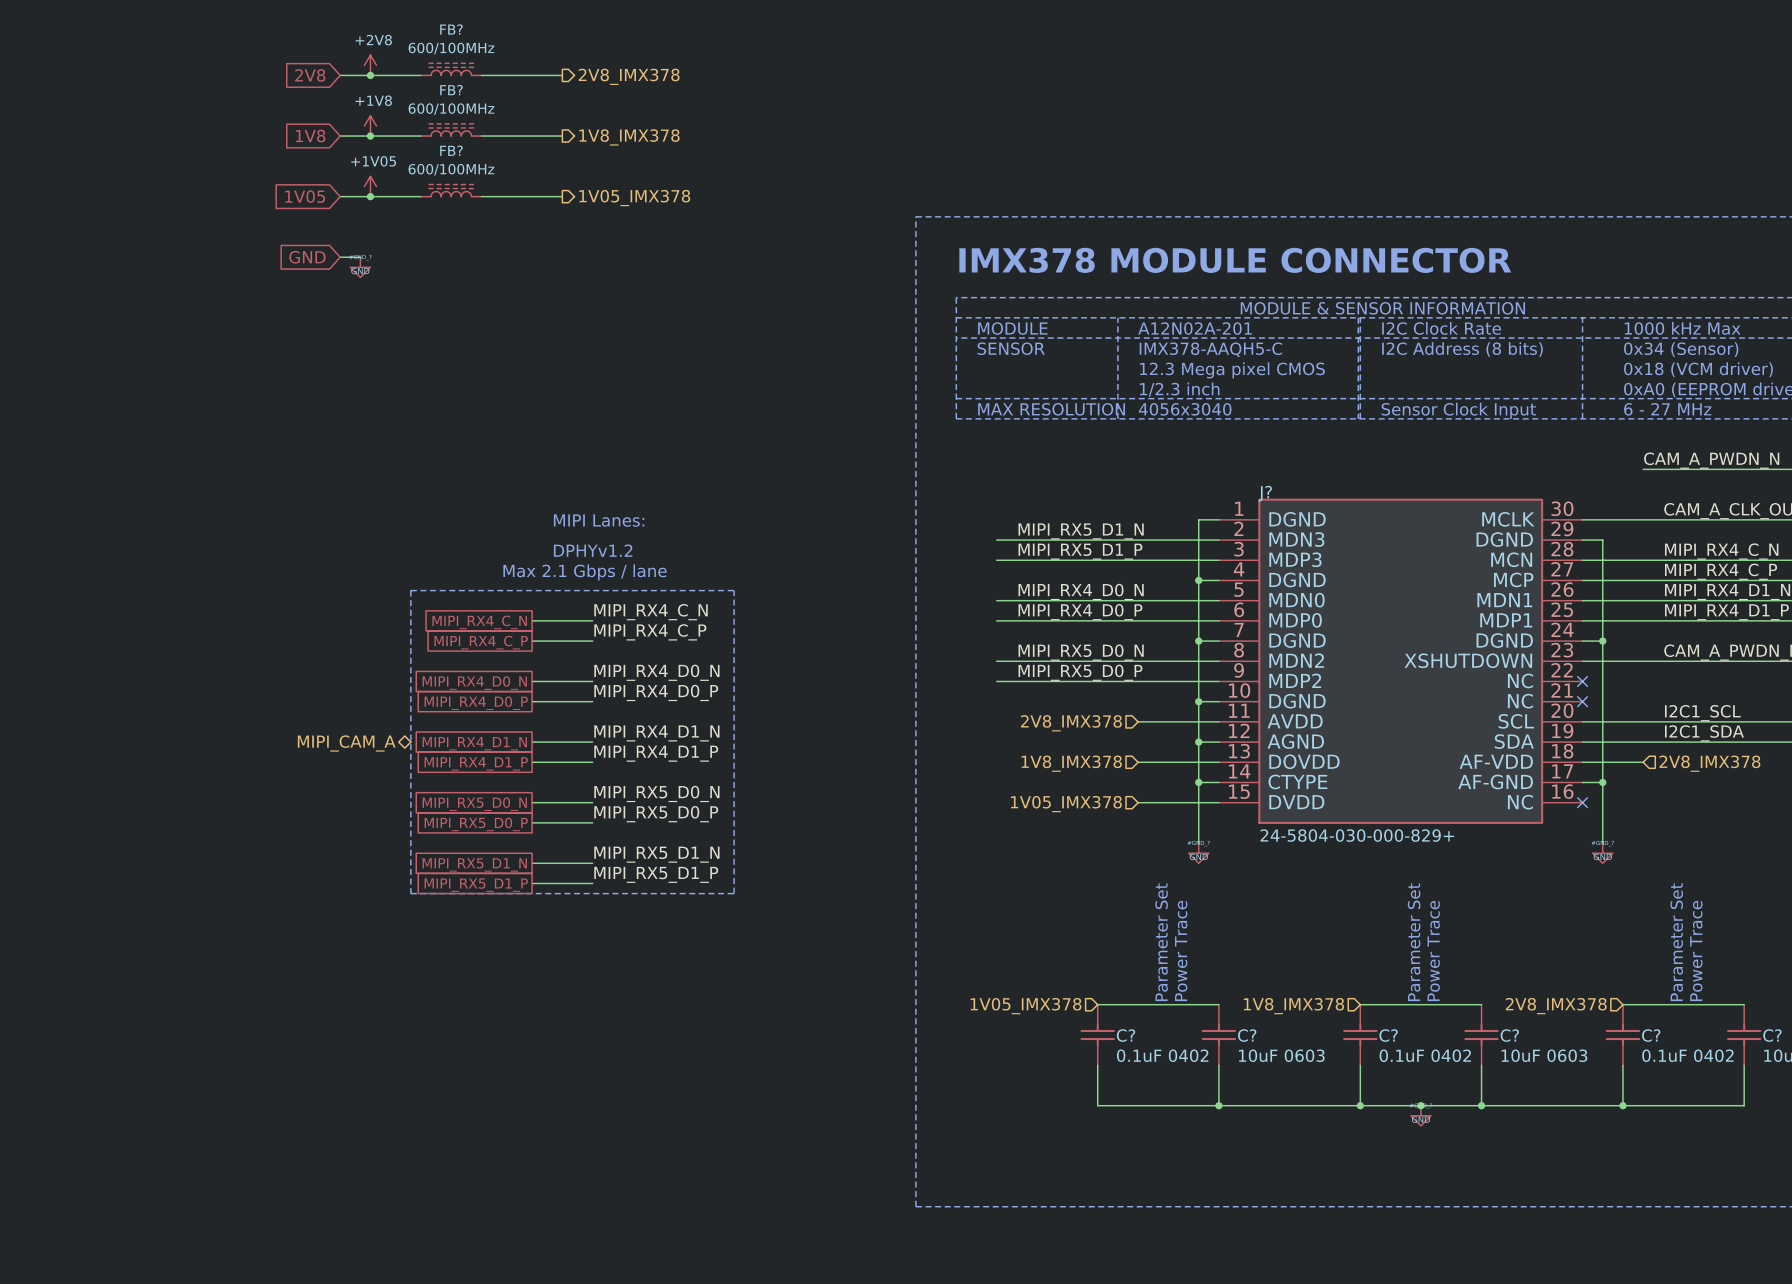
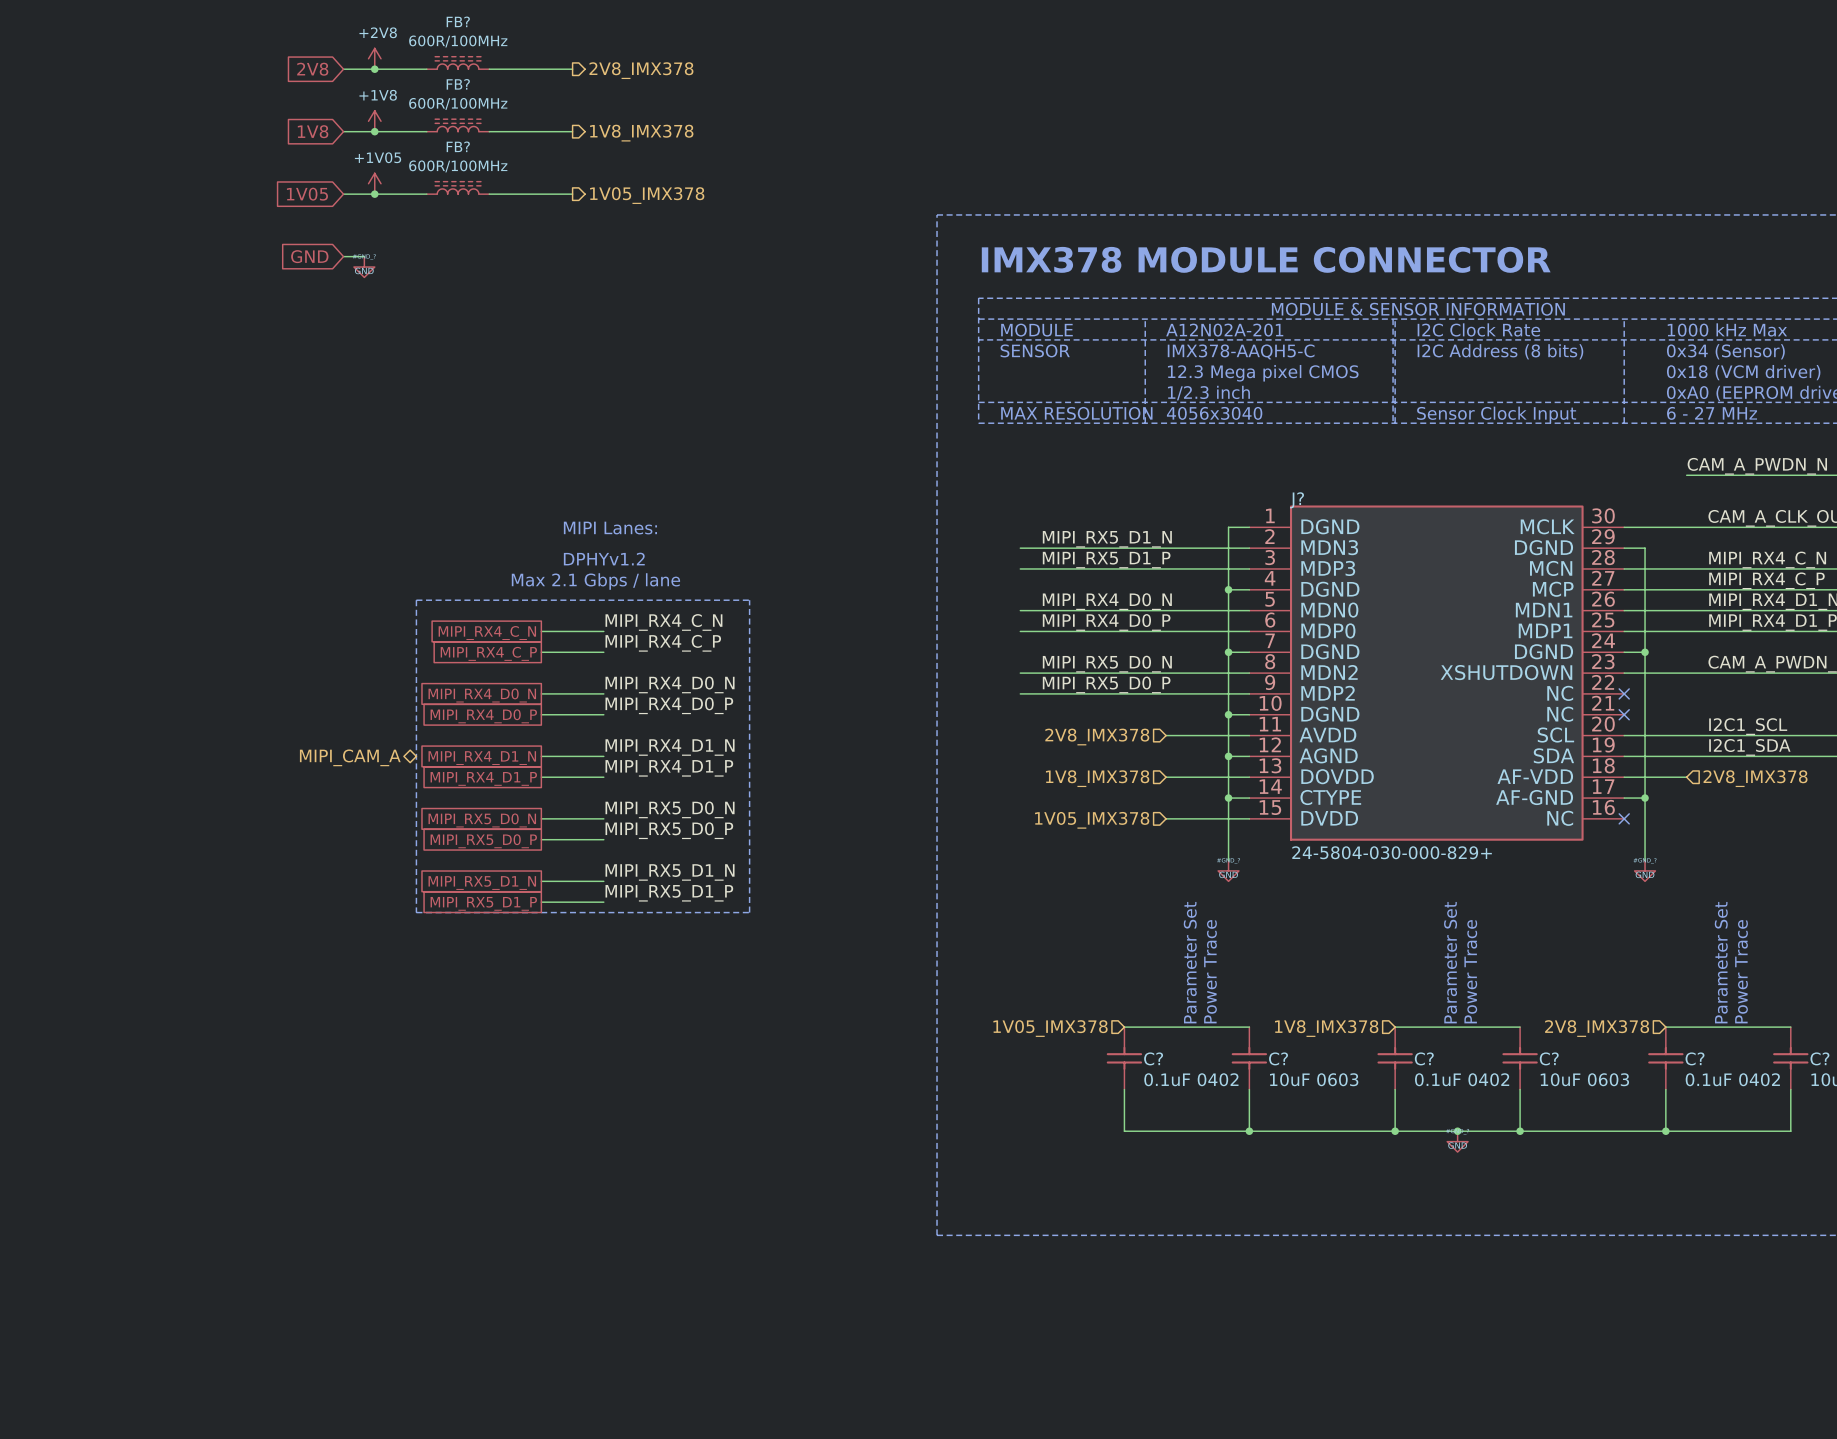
FB? value: 600/100MHz (451, 48) -> 600R/100MHz (458, 41)
FB? value: 600/100MHz (451, 109) -> 600R/100MHz (458, 103)
FB? value: 600/100MHz (451, 169) -> 600R/100MHz (458, 166)

